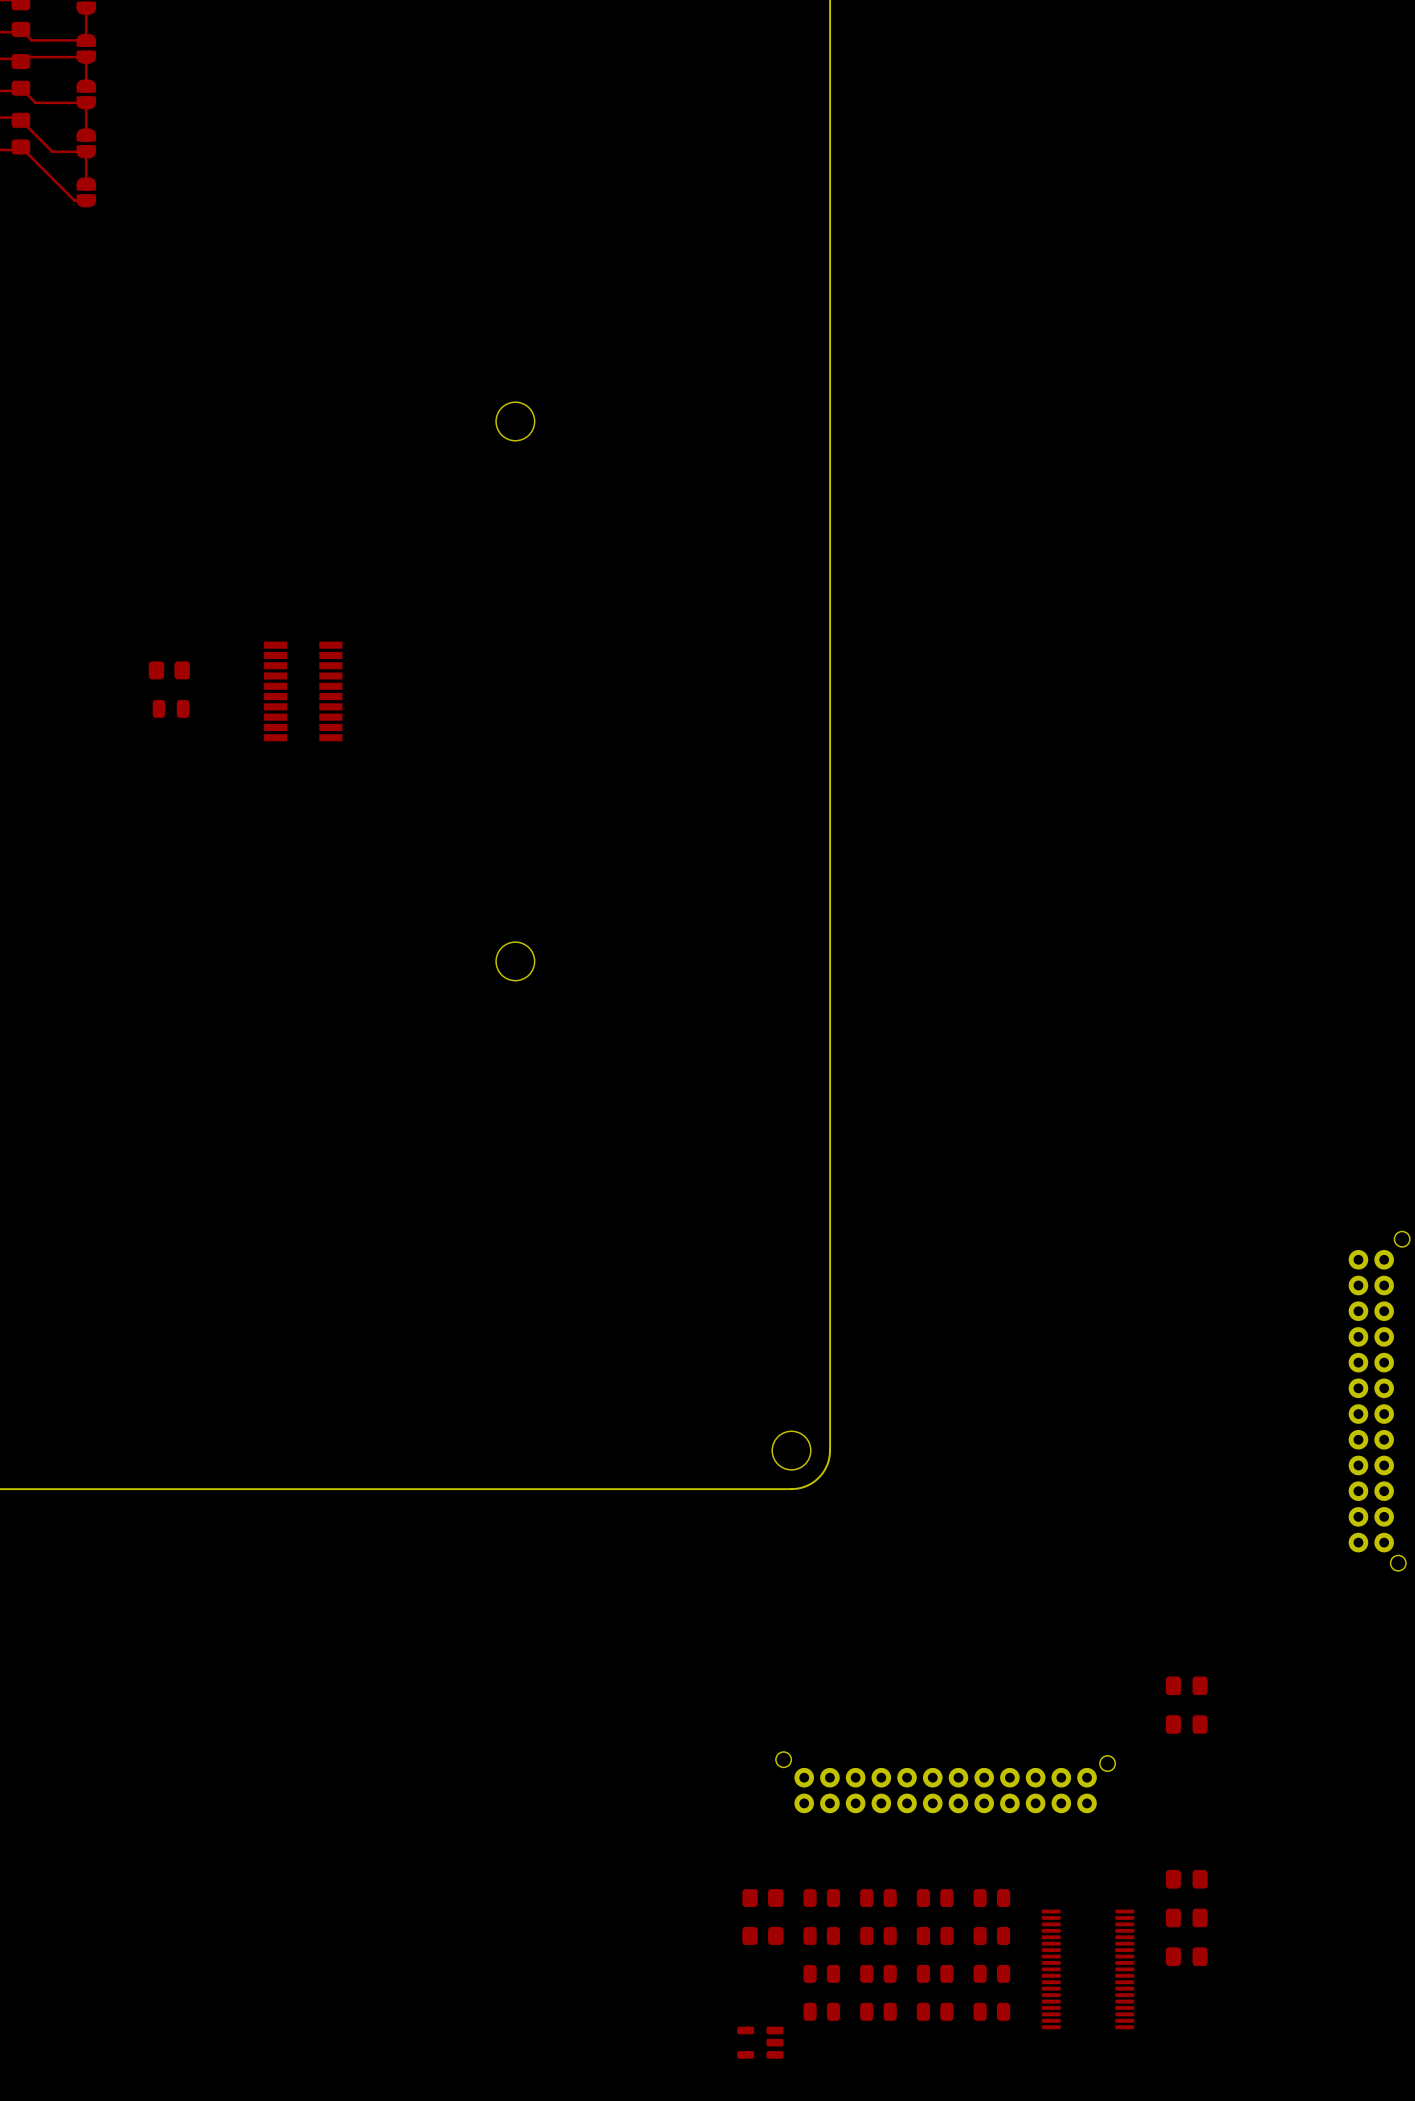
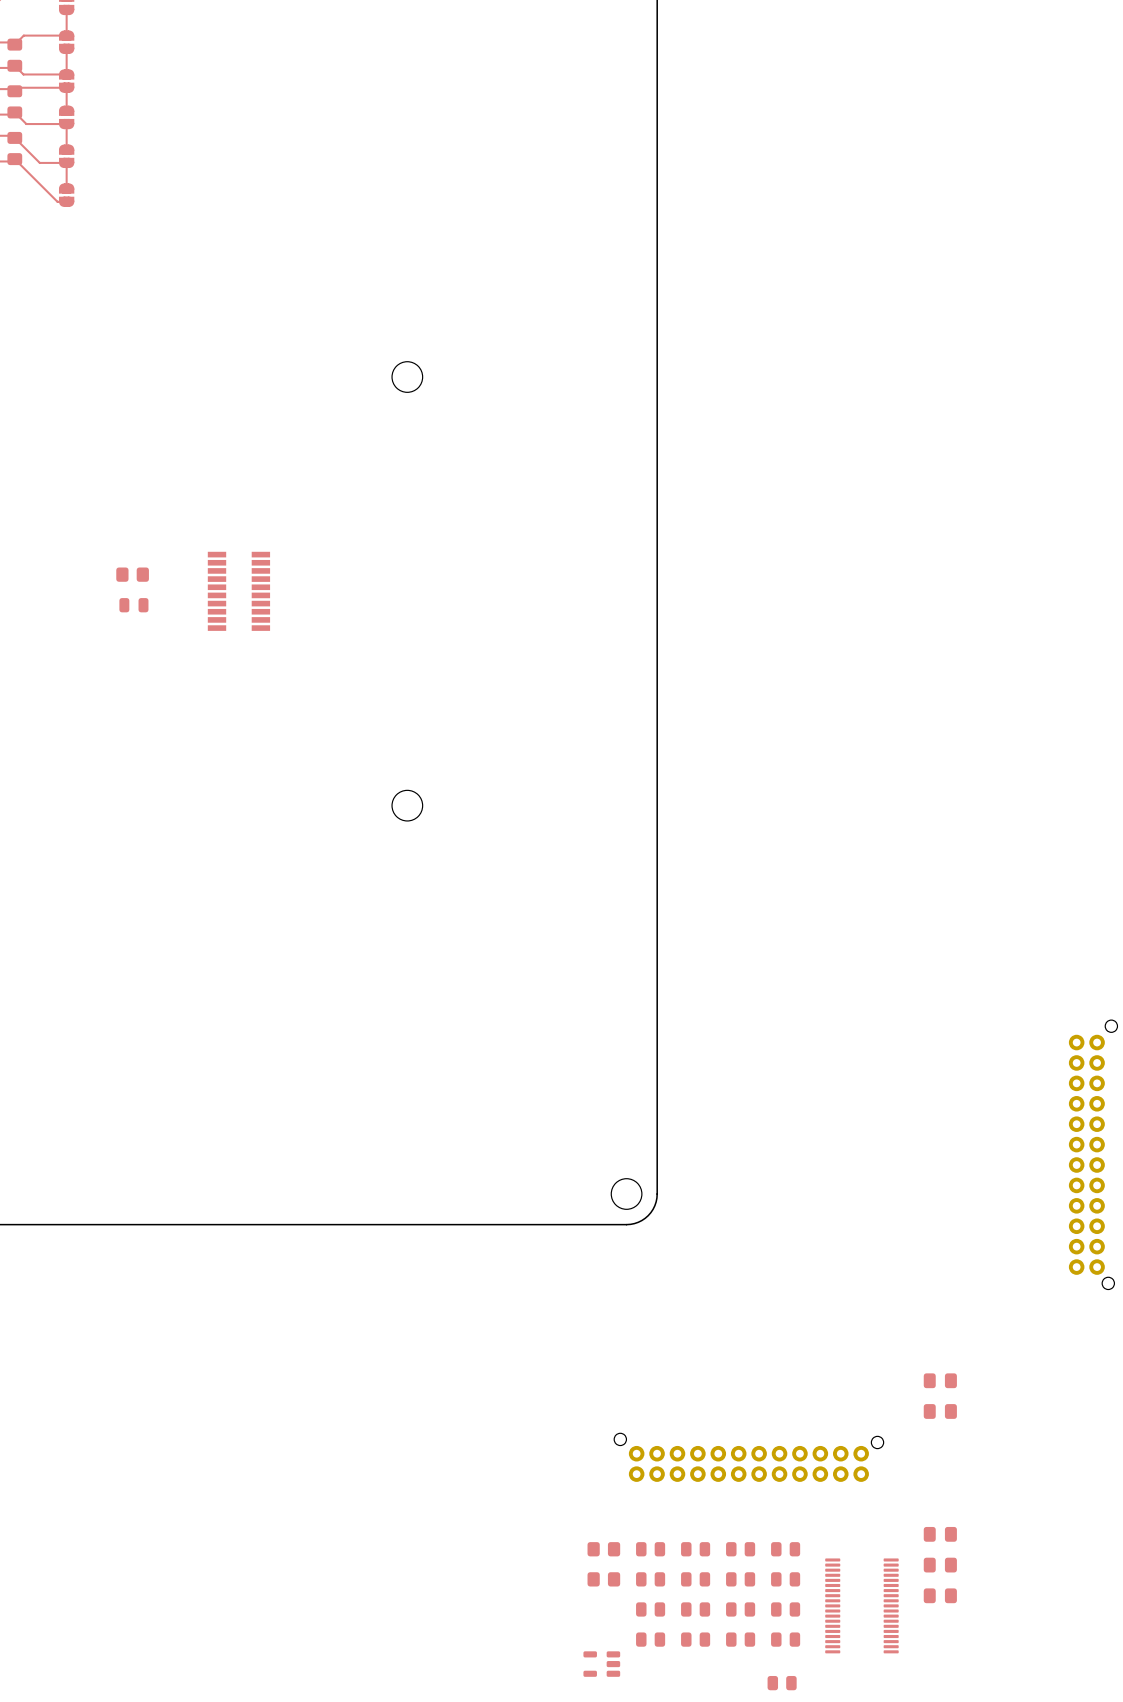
part: none -> (782, 1683)

